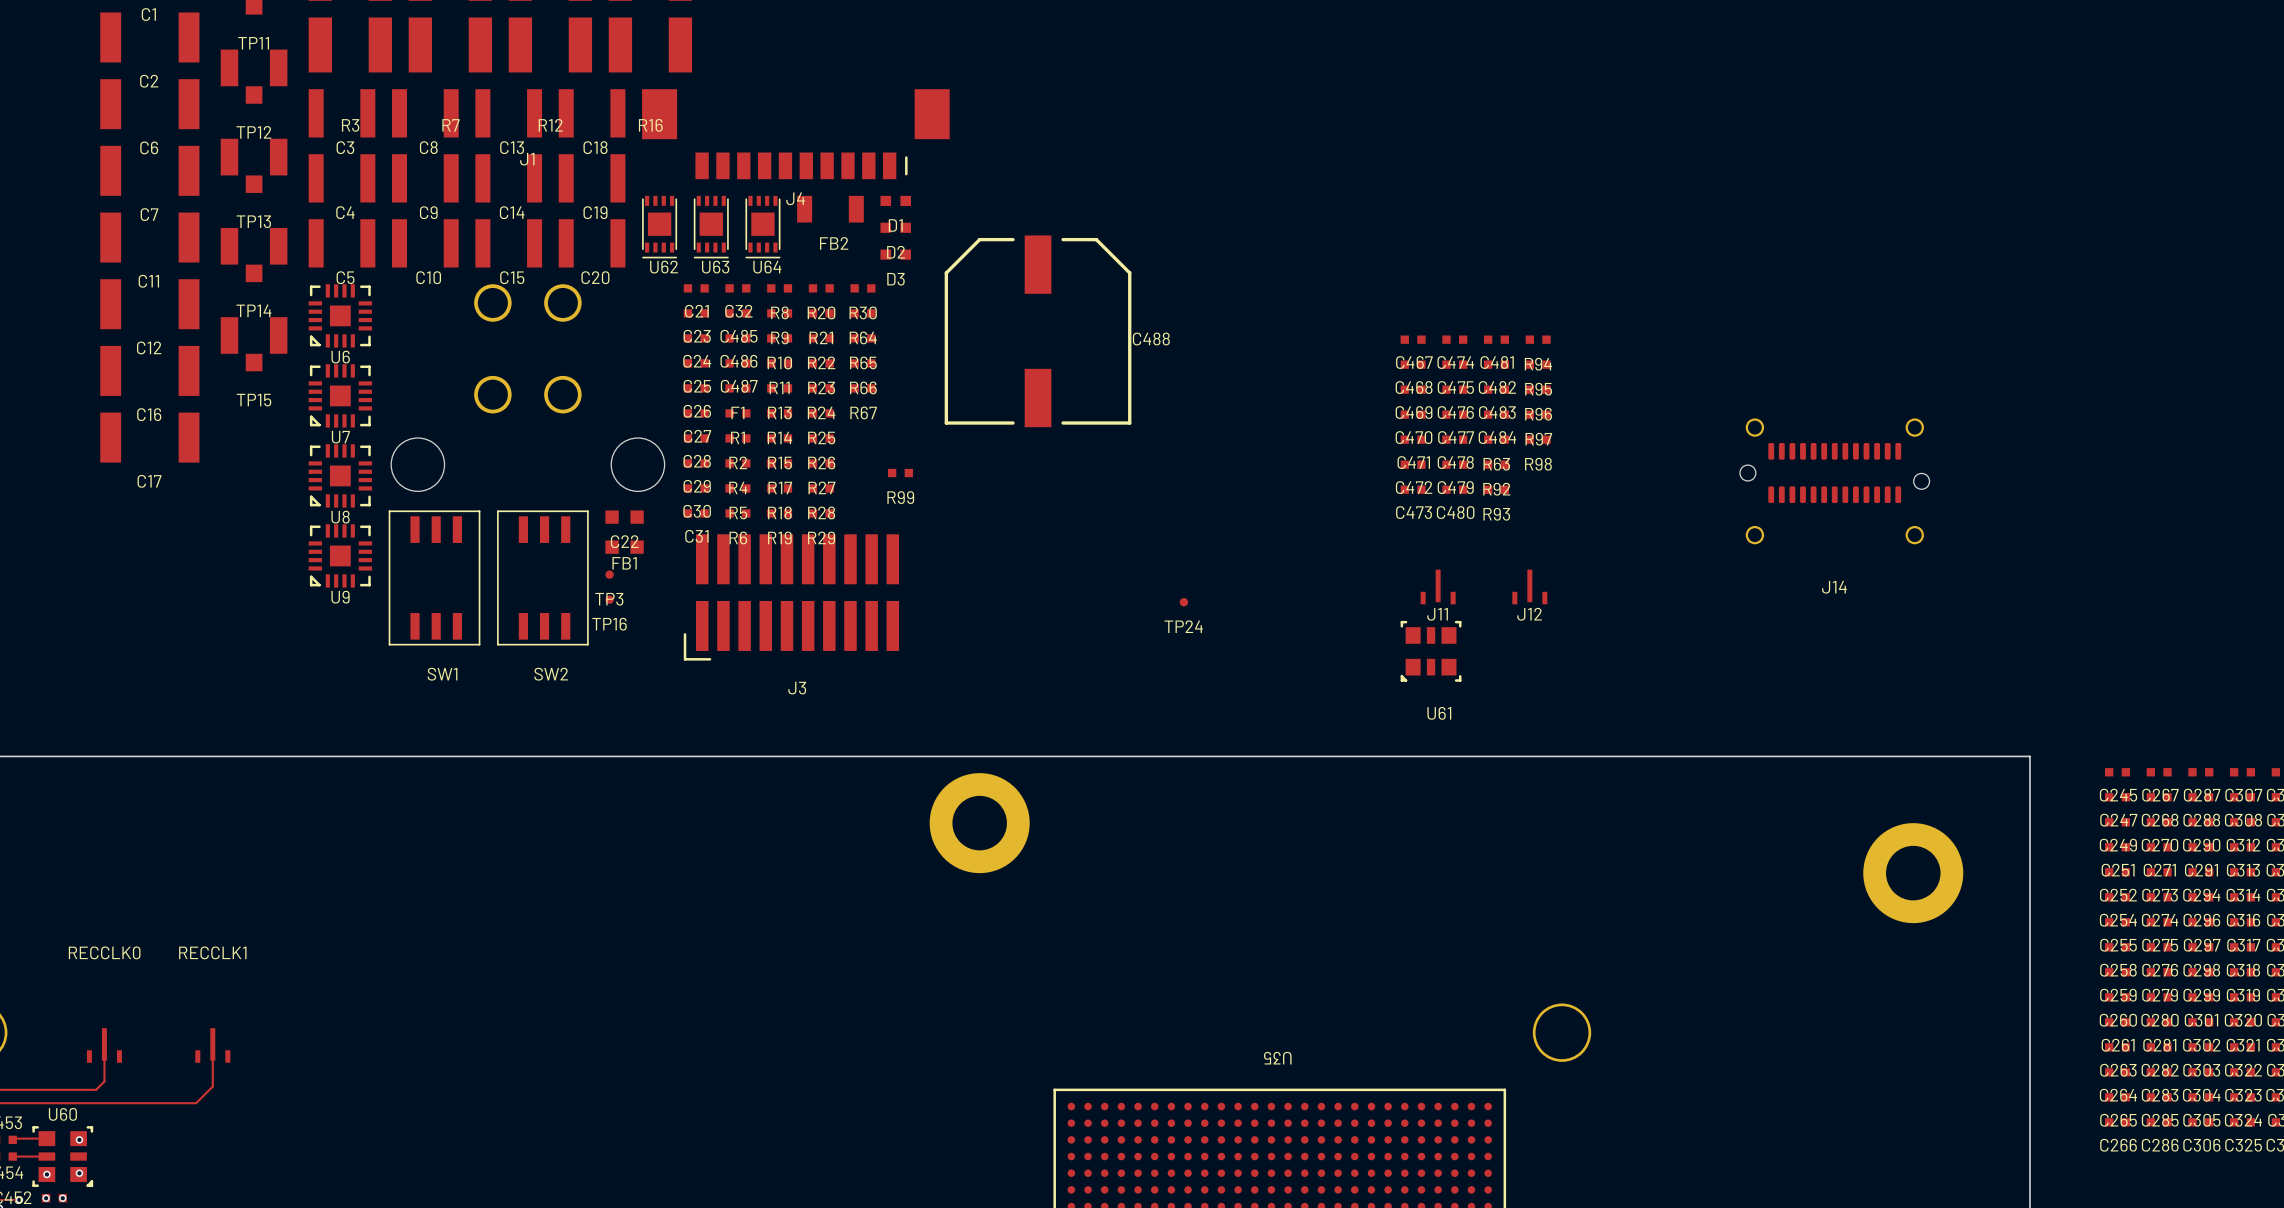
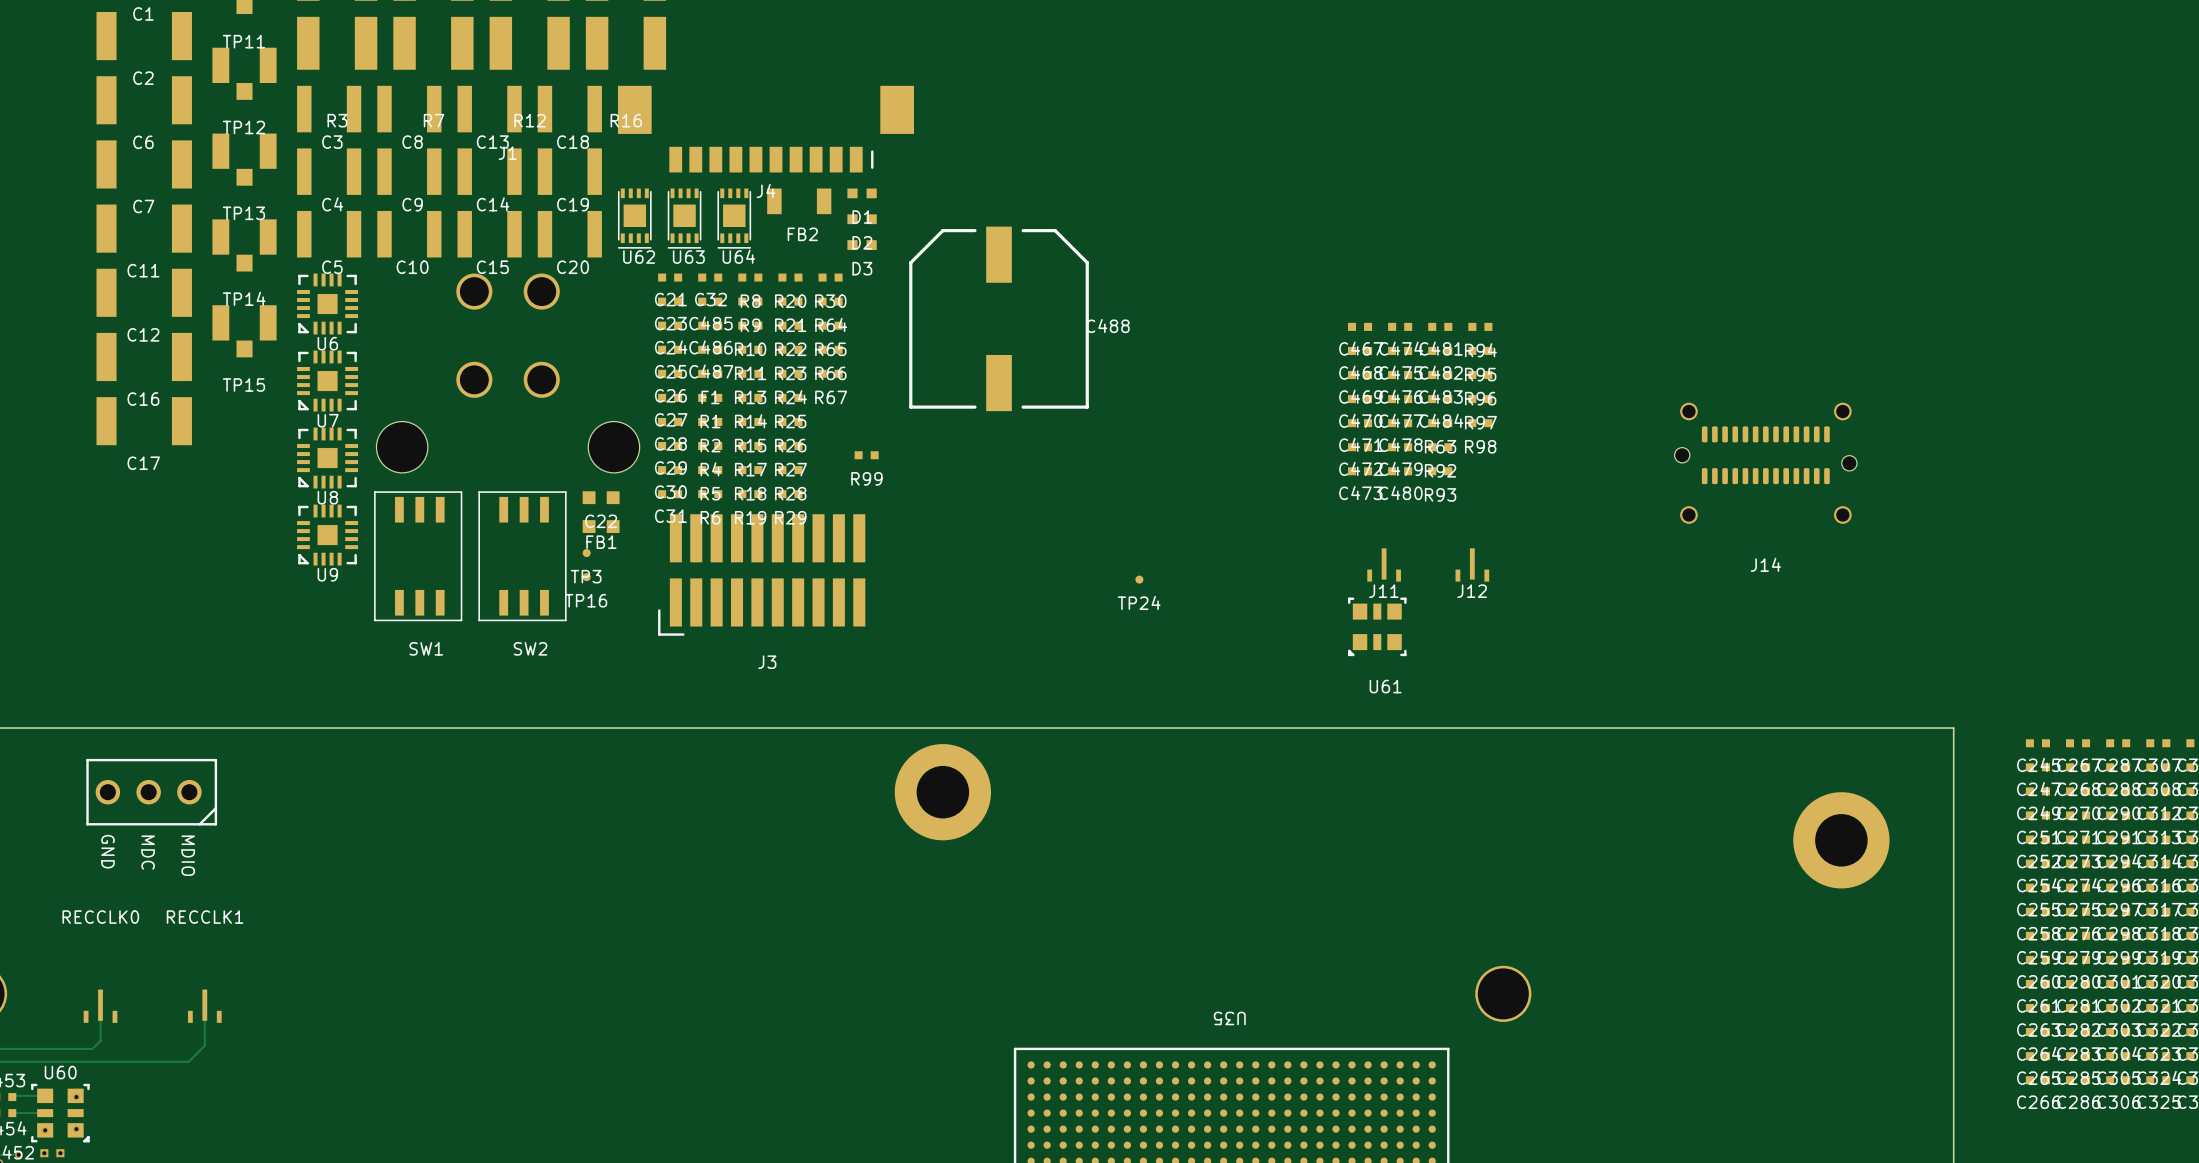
part: none -> (151, 792)
text: none -> GND (108, 851)
text: none -> MDC (148, 852)
text: none -> MDIO (188, 855)

